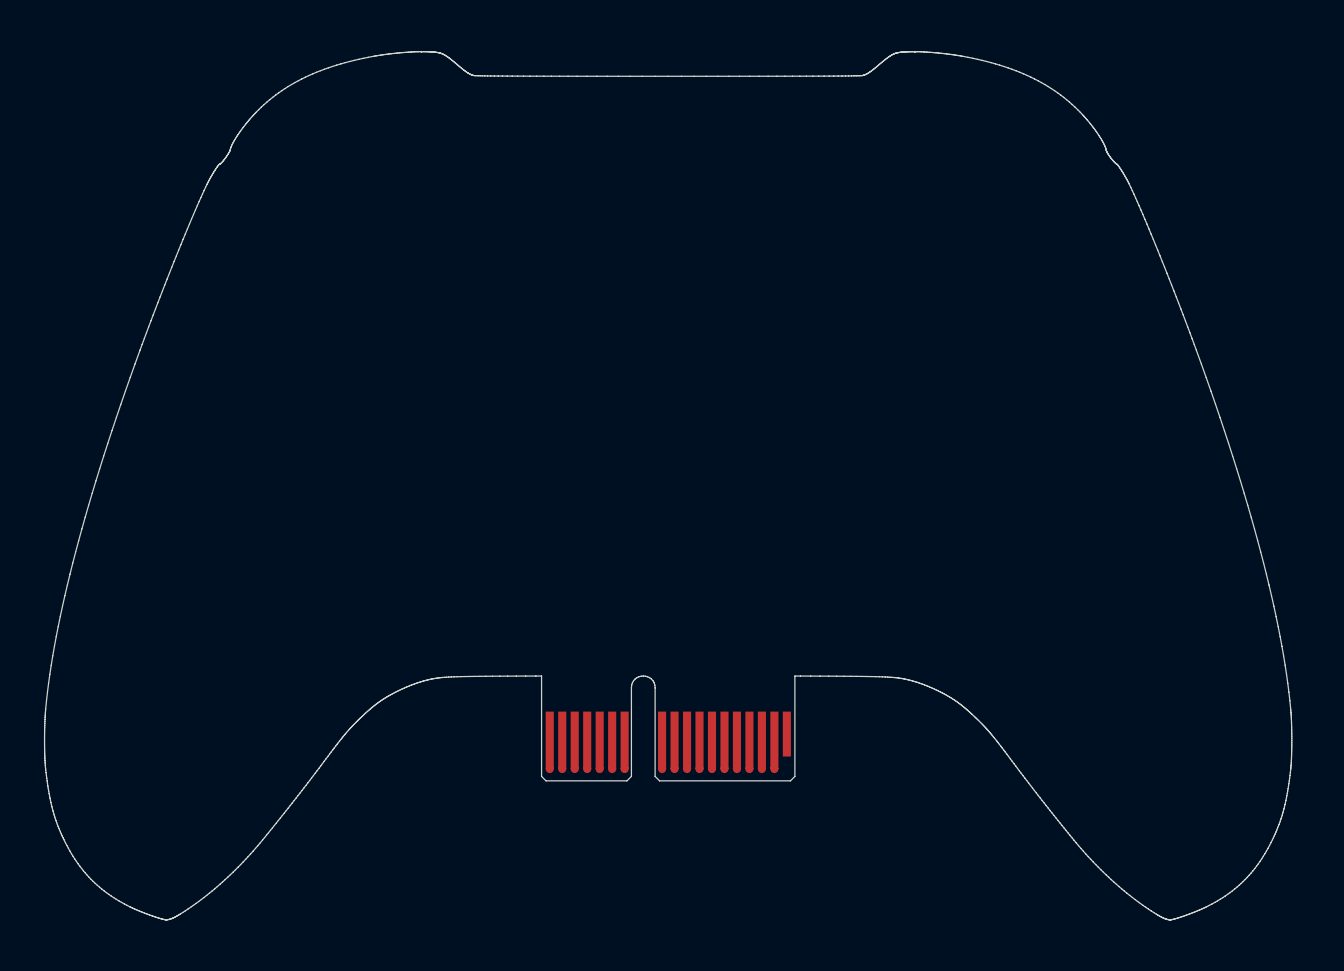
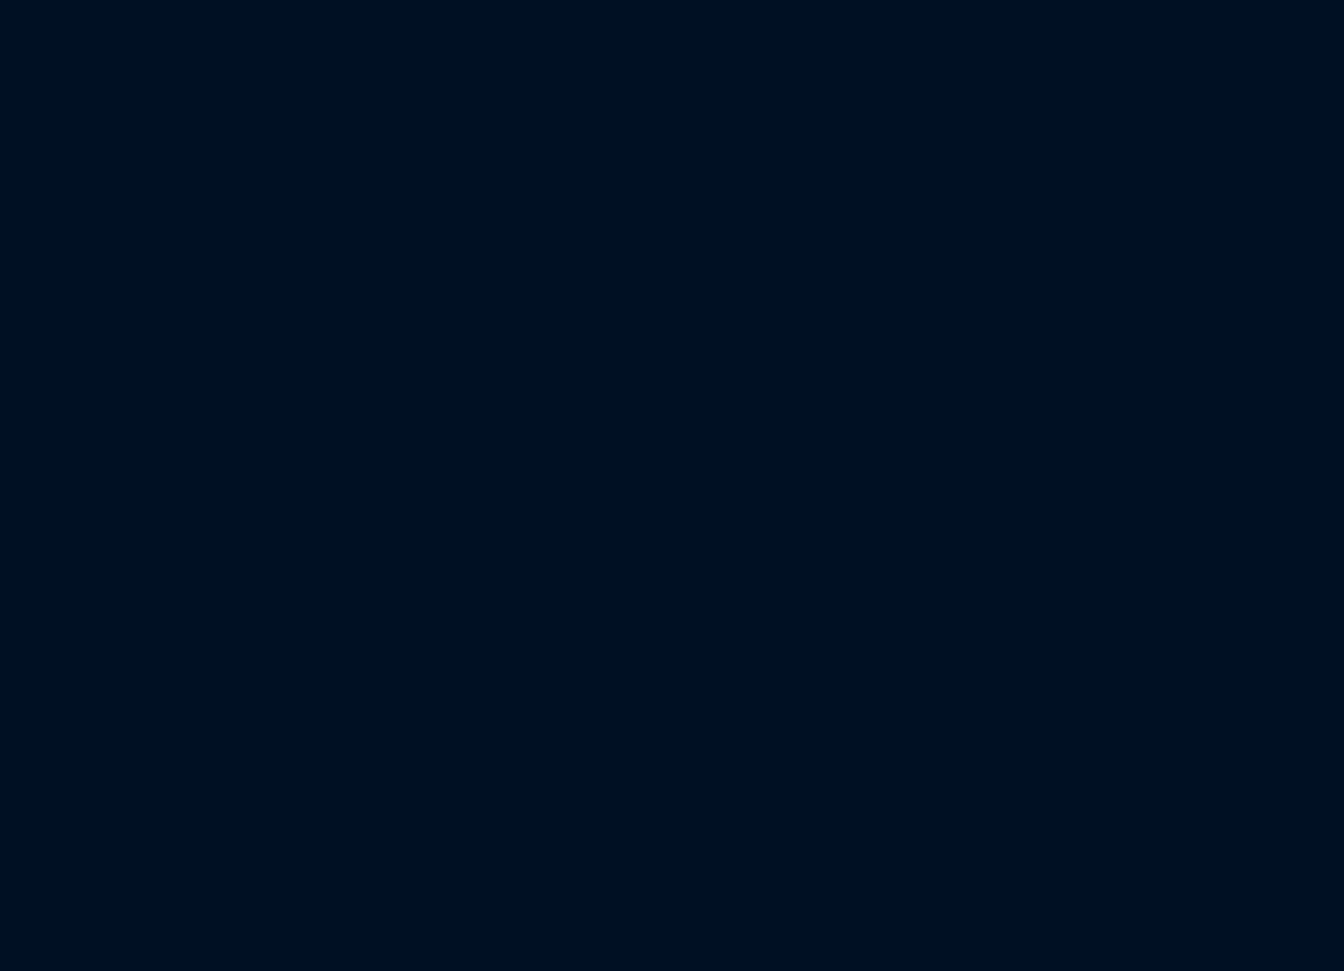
board edge: (230, 150) (237, 136) (252, 116) (269, 99) (288, 86) (332, 66) (383, 54) (415, 51) (439, 52) (467, 72) (475, 75) (833, 76) (863, 75) (894, 53) (917, 51) (952, 54) (986, 61) (1015, 70) (1041, 82) (1063, 97) (1082, 114) (1097, 133) (1108, 154) (1116, 164) -> none
board edge: (230, 150) (219, 164) -> none
board edge: (219, 164) (205, 187) (178, 250) (116, 417) (75, 551) (51, 665) (45, 709) (44, 738) (45, 768) (50, 802) (58, 828) (71, 853) (85, 873) (101, 889) (129, 906) (162, 919) (170, 918) (185, 910) (217, 886) (250, 853) (341, 738) (360, 718) (387, 696) (425, 680) (454, 676) (541, 676) (541, 776) (545, 780) (626, 780) (631, 776) (631, 685) (635, 678) (643, 676) (651, 678) (654, 685) (655, 776) (659, 780) (790, 780) (794, 776) (794, 676) (879, 676) (902, 678) (922, 684) (946, 695) (964, 707) (991, 733) (1058, 820) (1095, 864) (1137, 901) (1160, 916) (1171, 919) (1202, 908) (1227, 894) (1249, 875) (1266, 851) (1279, 822) (1287, 793) (1291, 758) (1291, 714) (1283, 655) (1271, 595) (1232, 456) (1201, 363) (1166, 273) (1132, 190) (1117, 164) -> none
part: (668, 742) -> none

